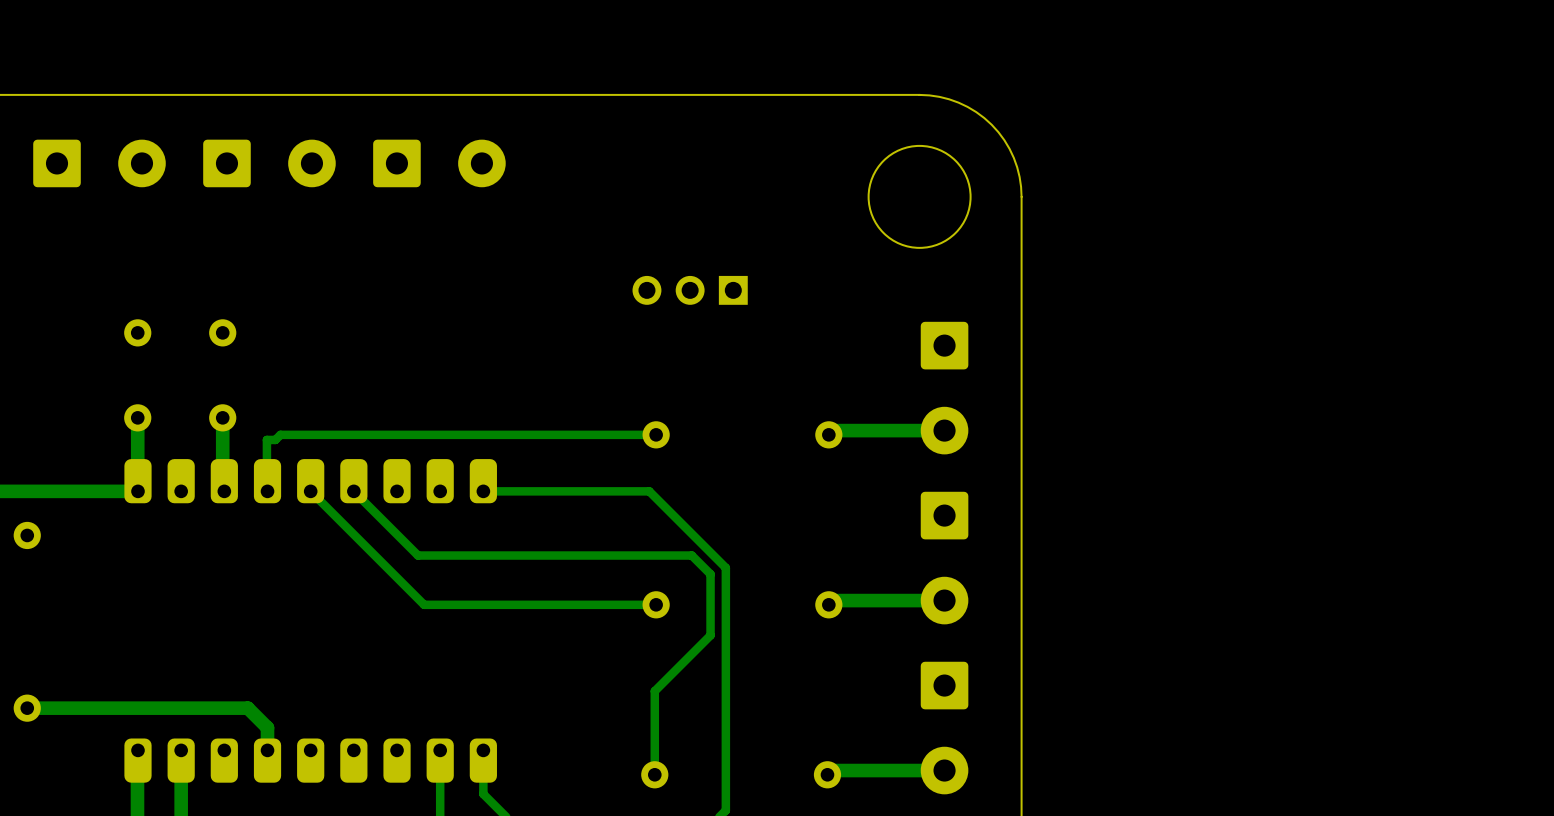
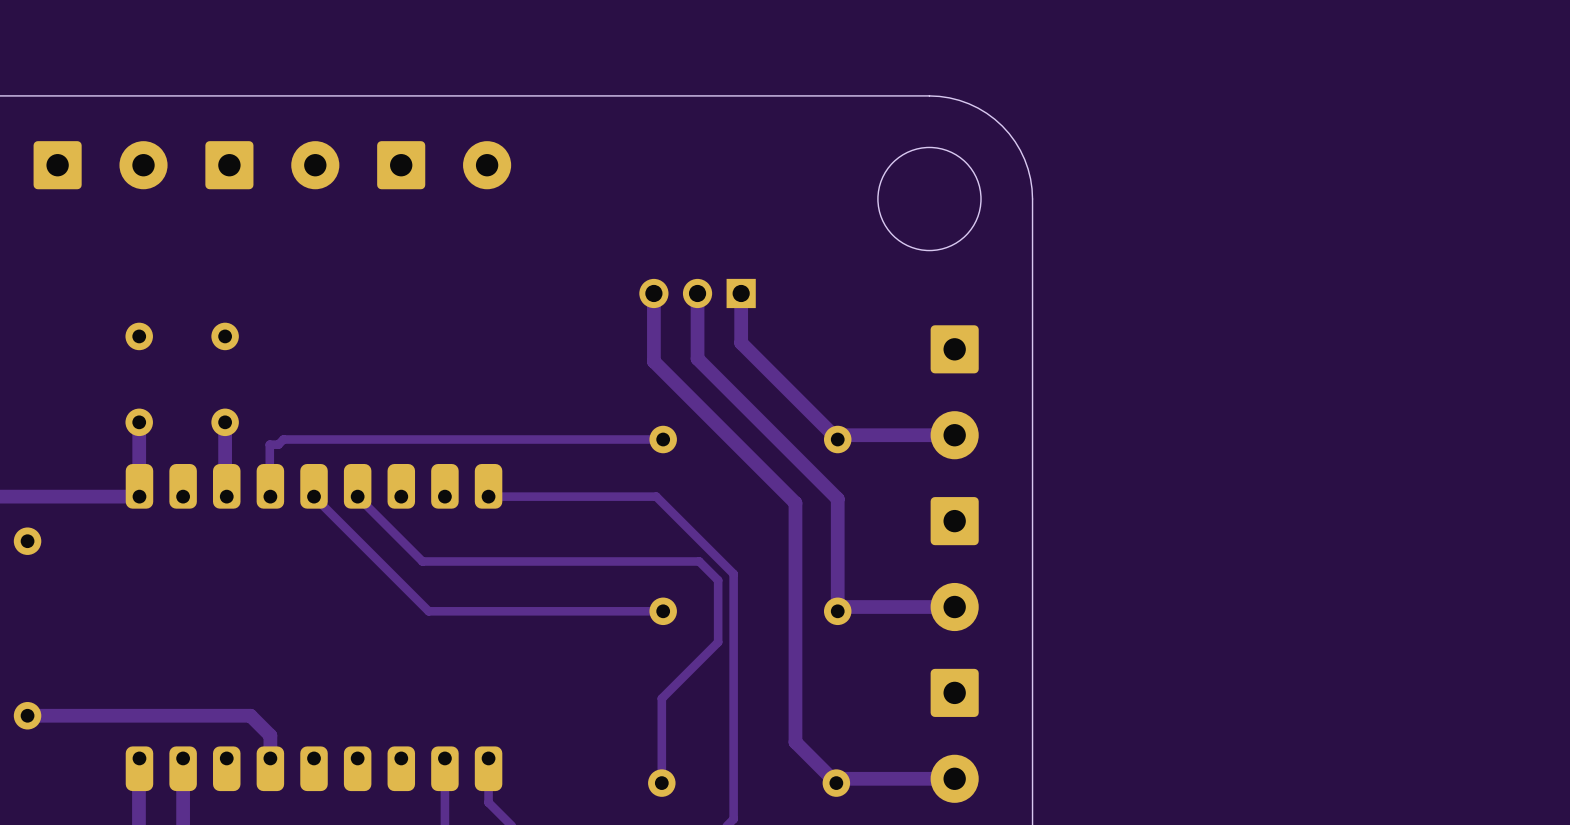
track: none -> (653, 293) (653, 361) (795, 503) (795, 742) (836, 783)
track: none -> (697, 293) (697, 358) (837, 498) (837, 611)
track: none -> (741, 293) (741, 342) (837, 439)

